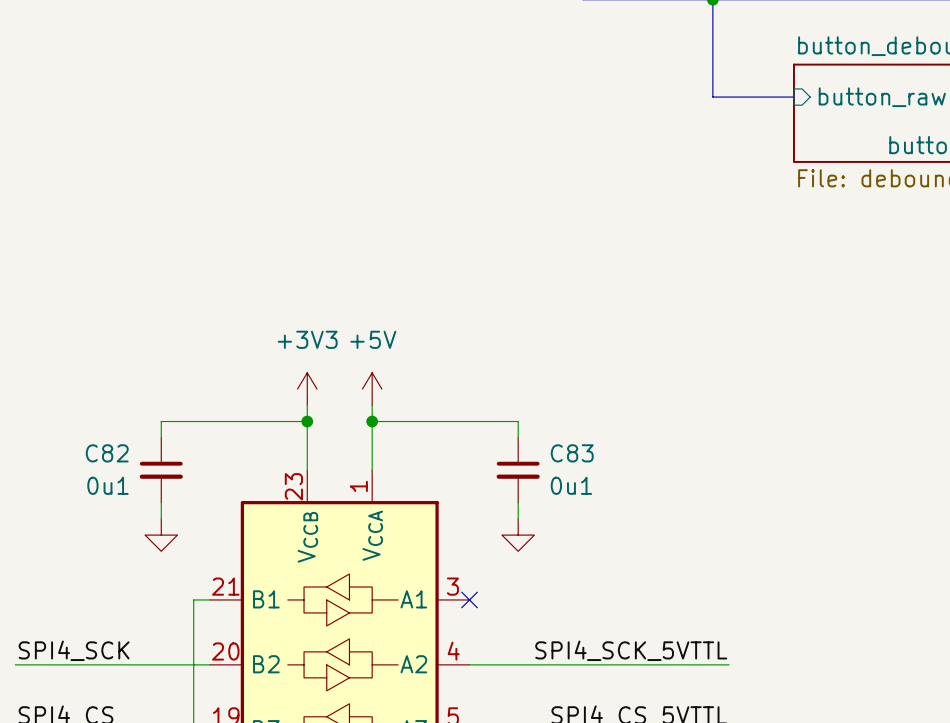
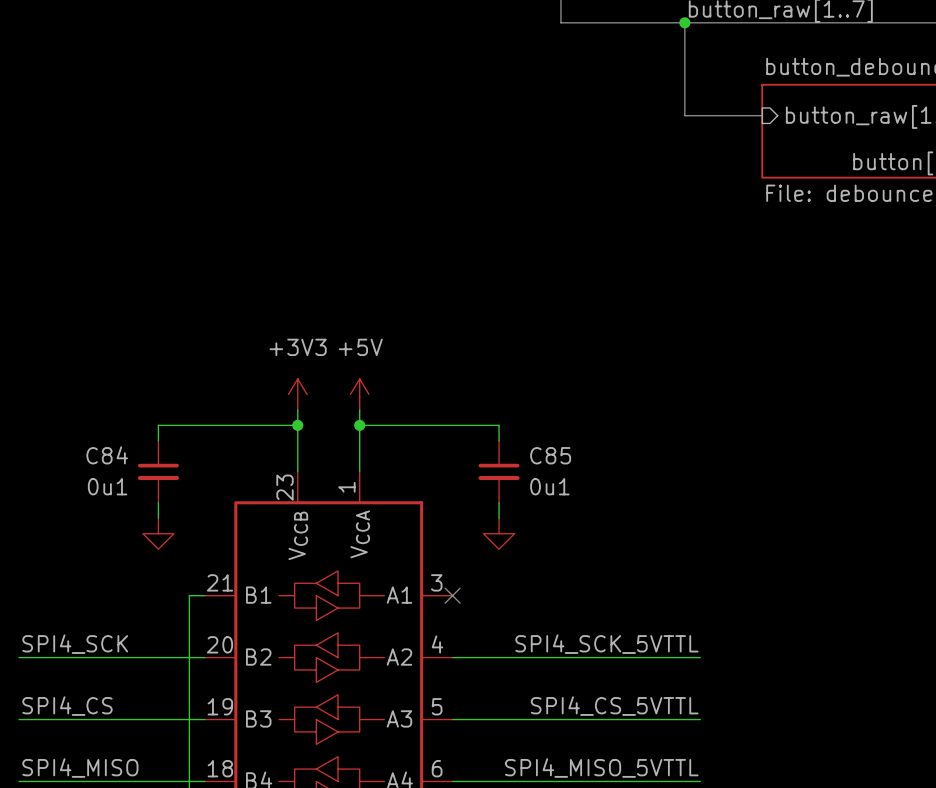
C82 name: C82 (107, 453) -> C84 (107, 455)
C83 name: C83 (572, 453) -> C85 (550, 455)

